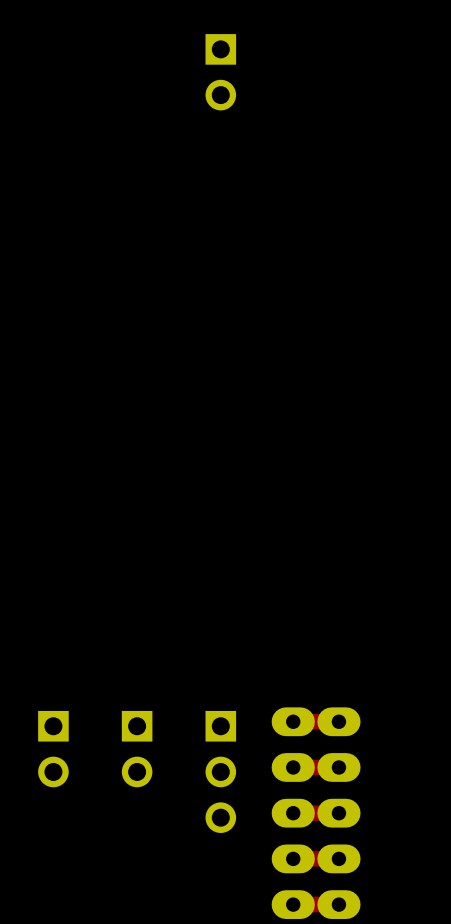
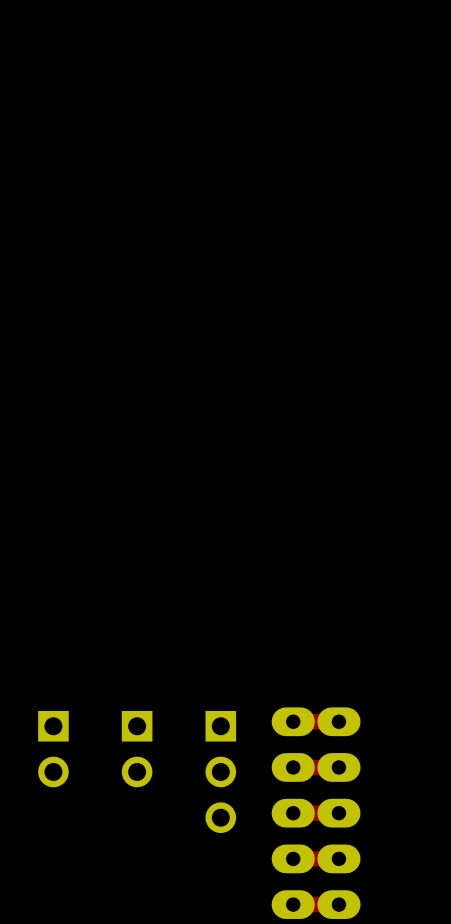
part: (220, 72) -> none

